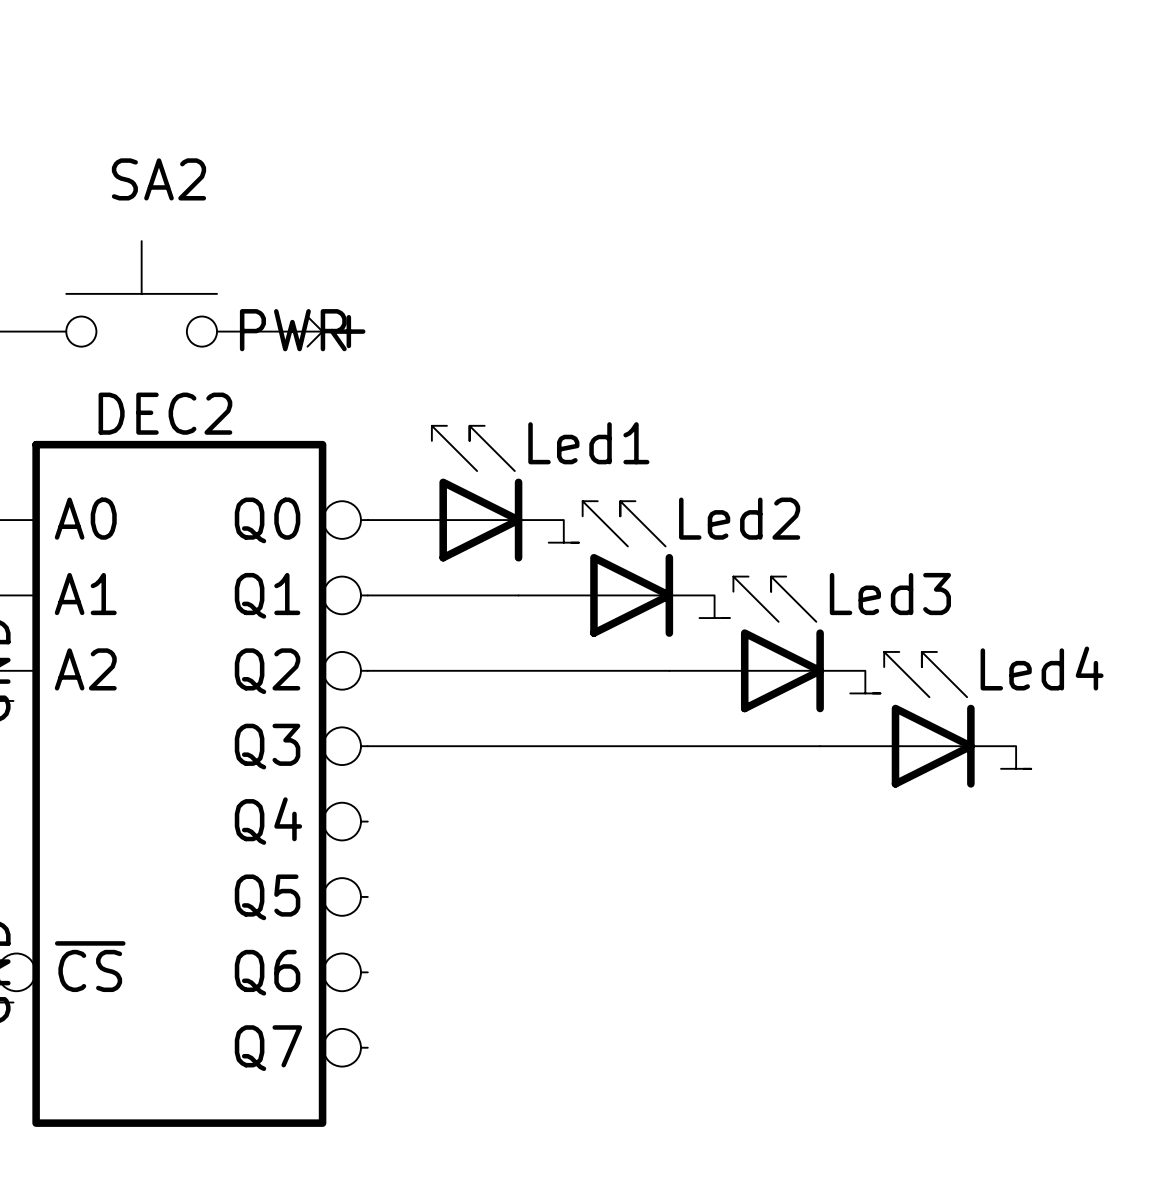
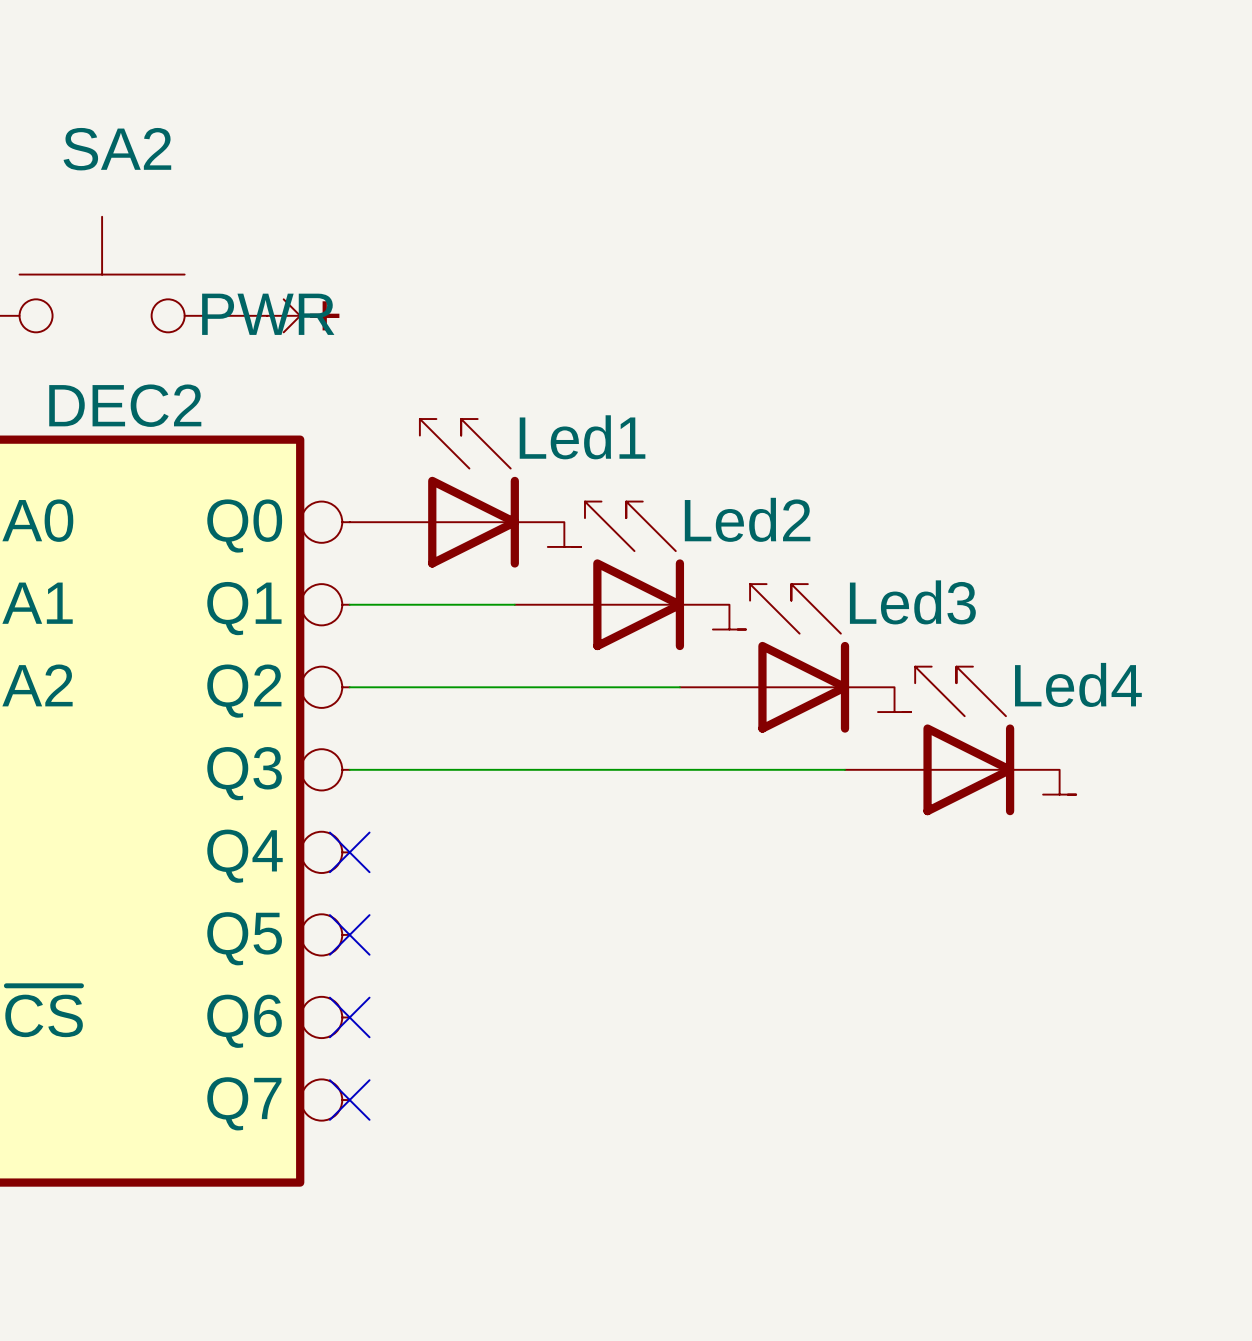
no-connect mark: none -> (349, 852)
no-connect mark: none -> (349, 934)
no-connect mark: none -> (349, 1017)
no-connect mark: none -> (349, 1100)

